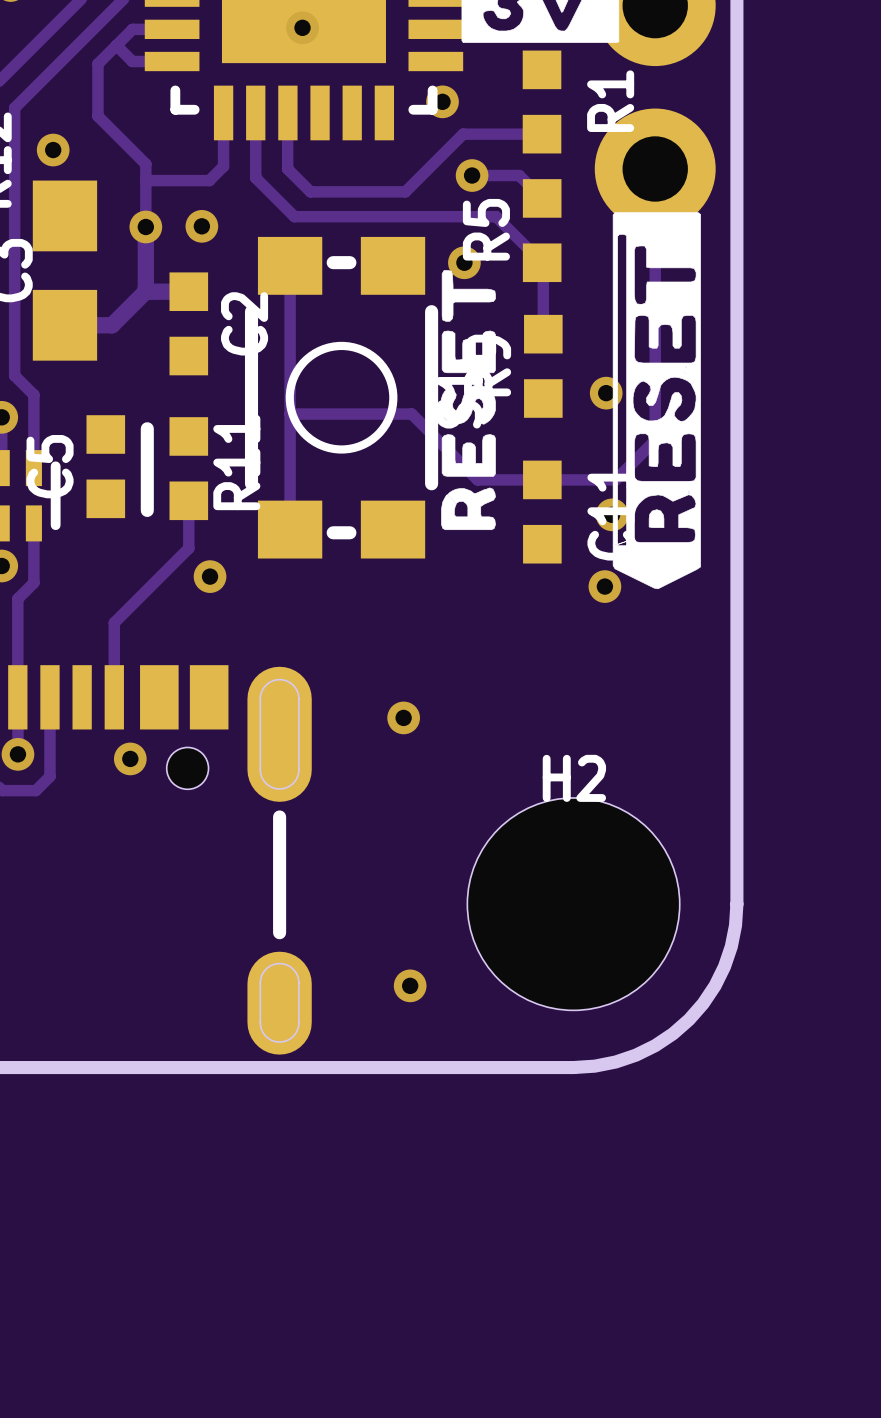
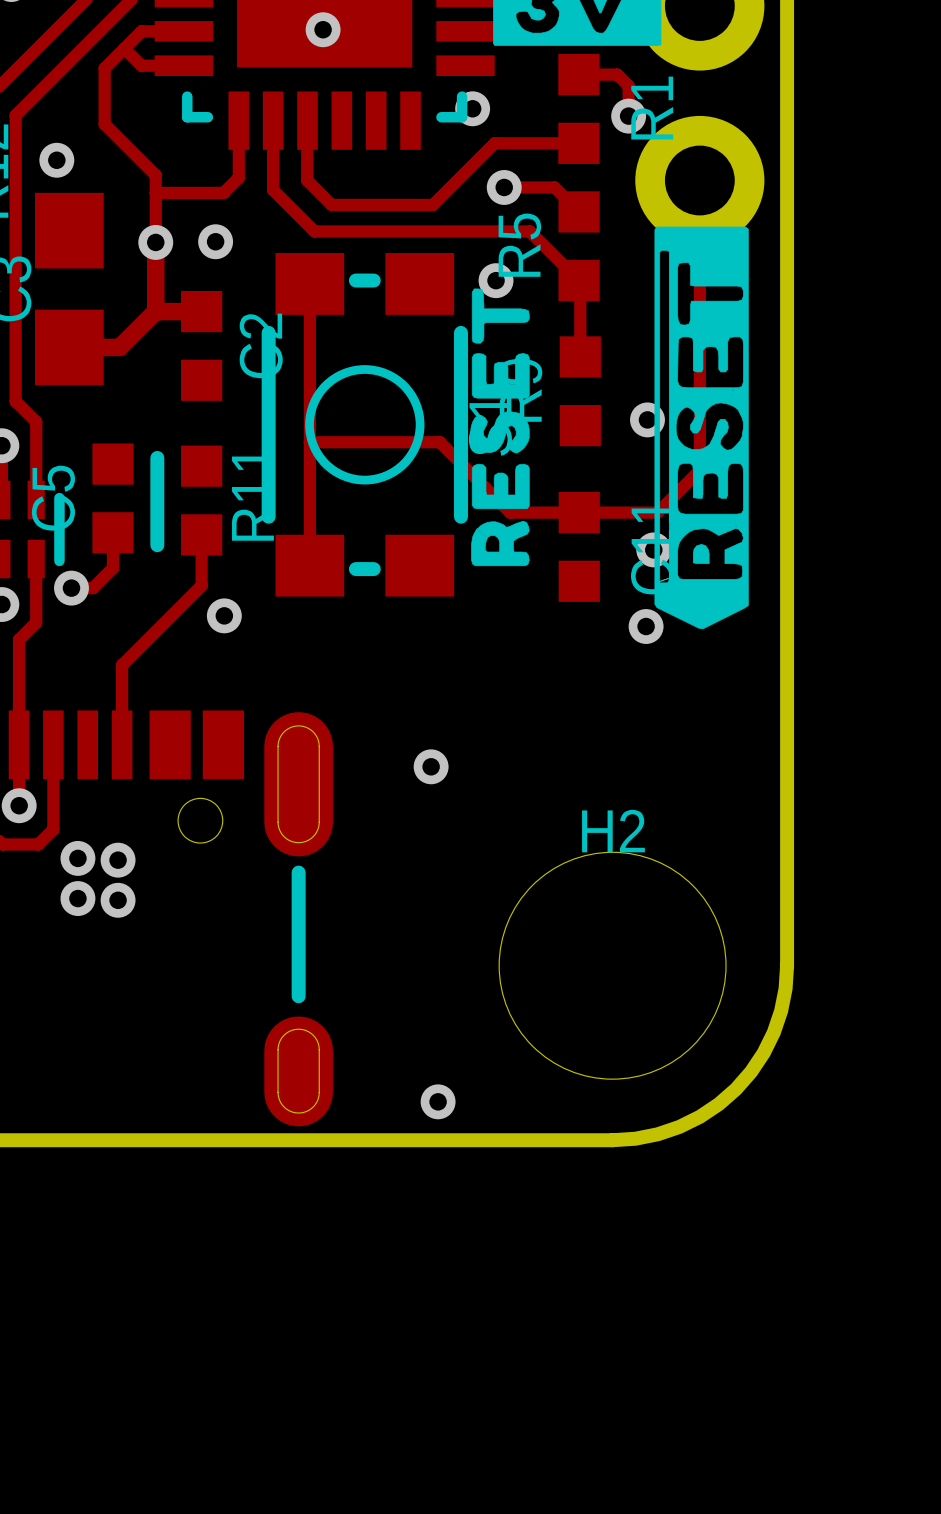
track: none -> (578, 74) (617, 74) (628, 85) (628, 116)
via: none -> (628, 116)
track: none -> (113, 532) (113, 568) (92, 588) (71, 588)
via: none -> (71, 588)
via: (130, 758) -> none
via: none -> (77, 858)
via: none -> (118, 860)
via: none -> (77, 898)
via: none -> (118, 900)
via position: (410, 985) -> (438, 1101)

